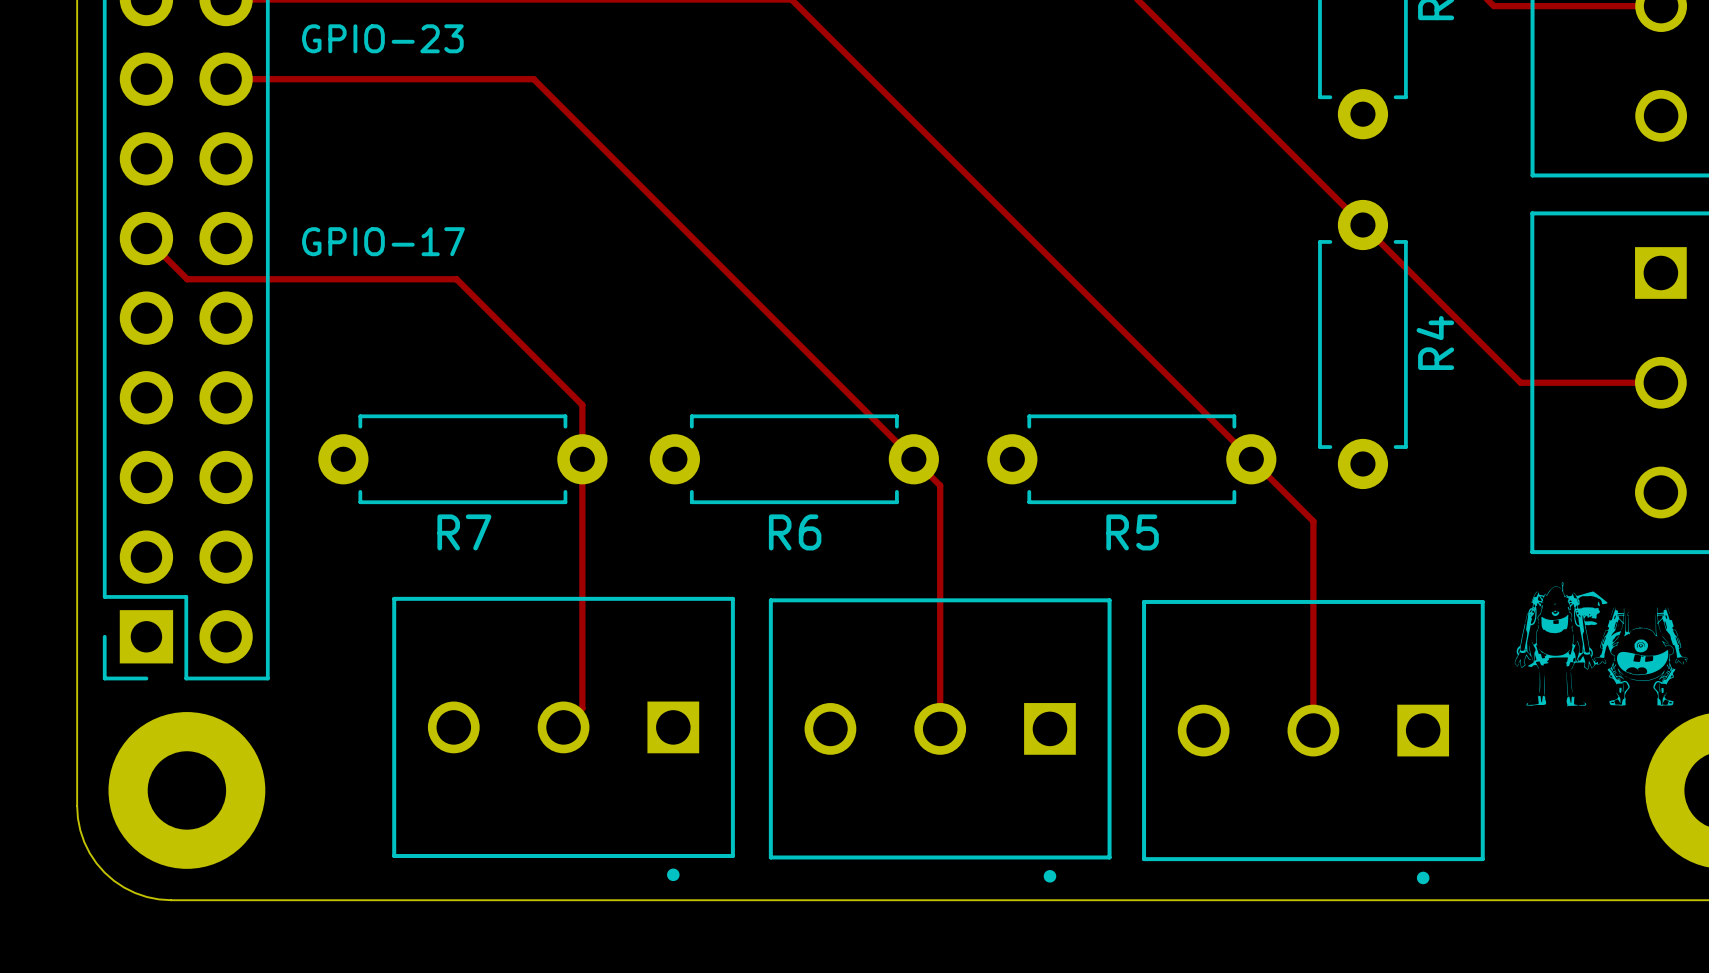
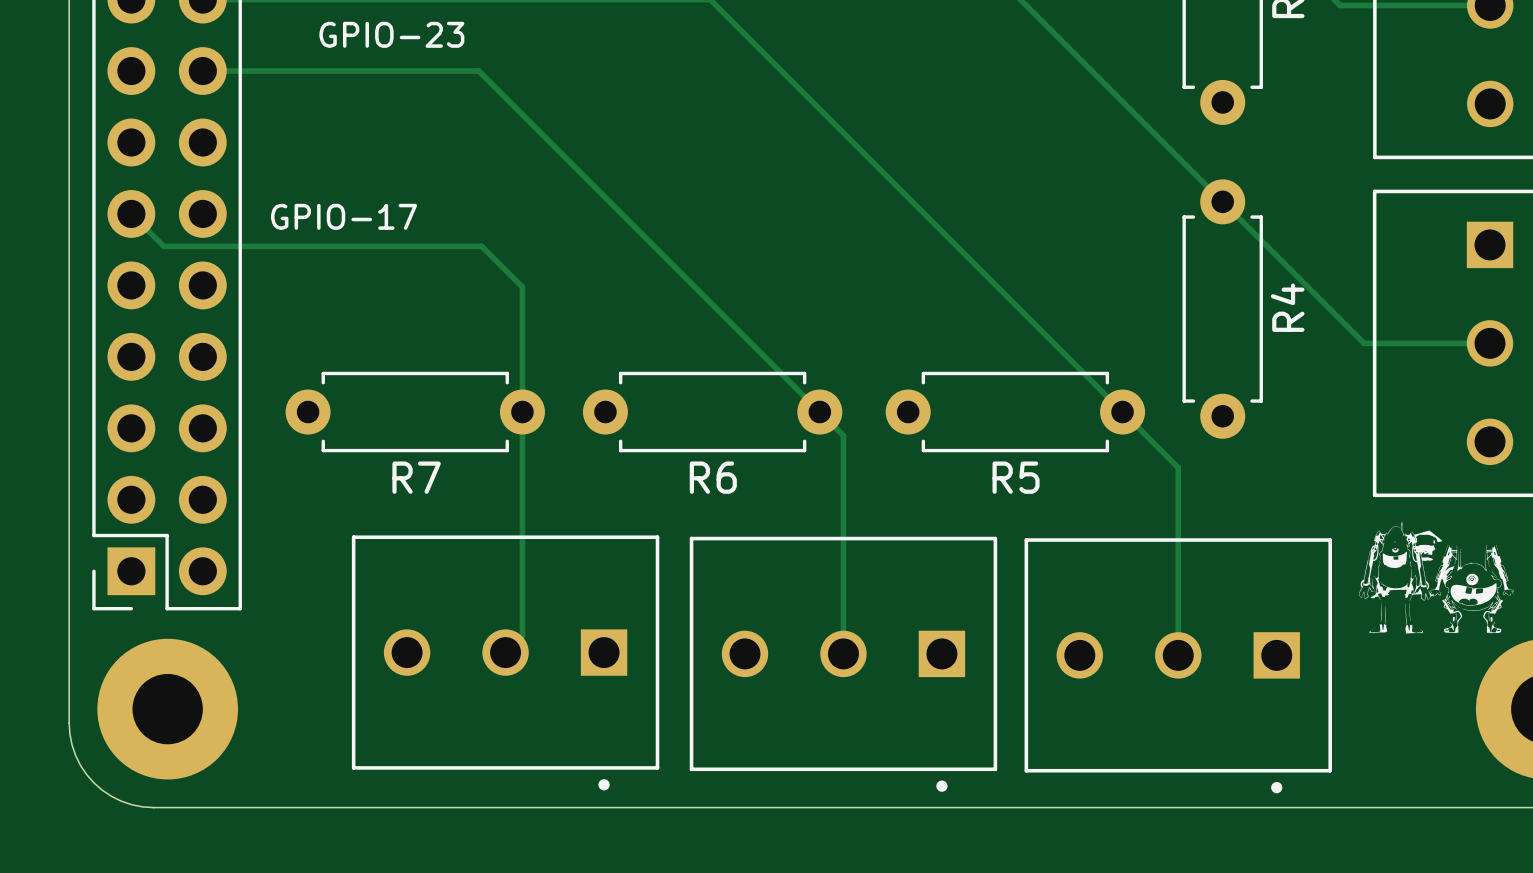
text position: GPIO-23 (382, 38) -> GPIO-23 (391, 34)
track: (182, 274) (187, 279) (456, 279) (582, 405) -> (163, 246) (481, 246) (522, 287) (522, 363)

